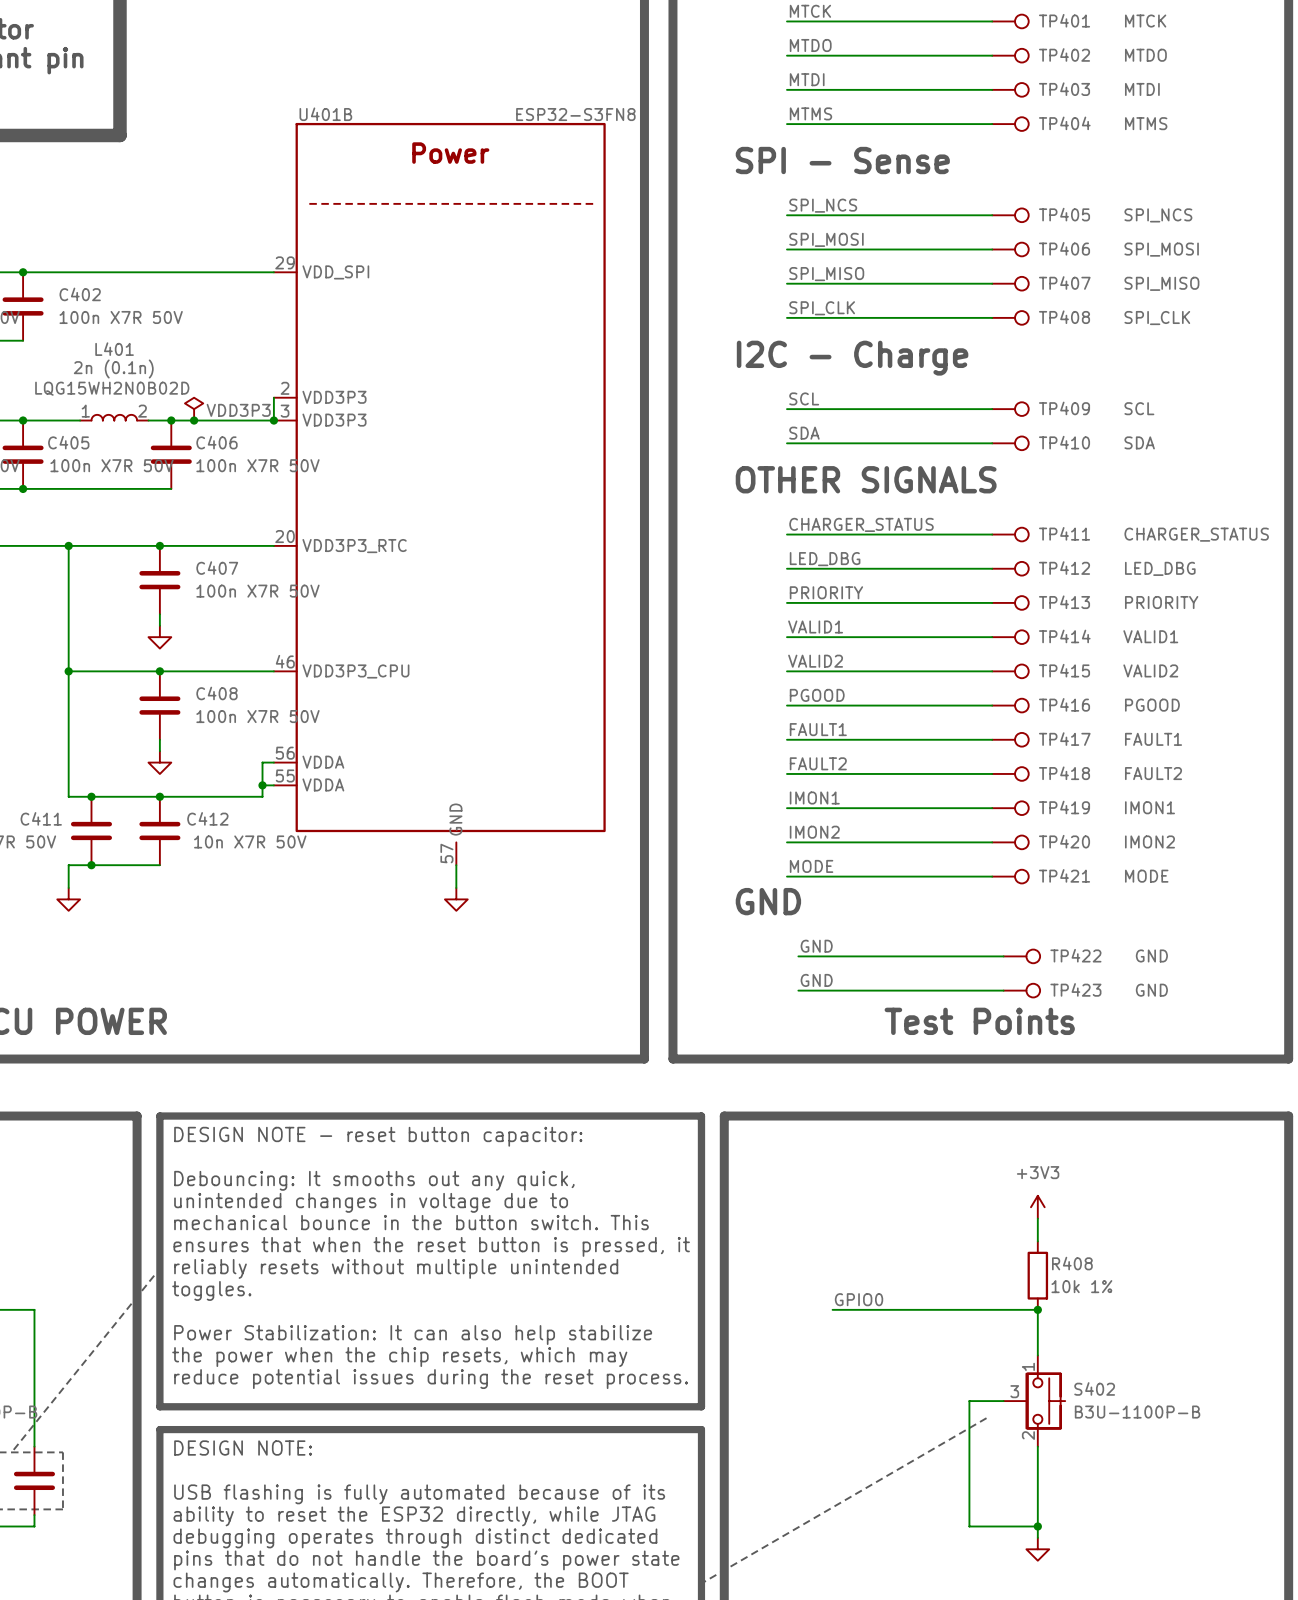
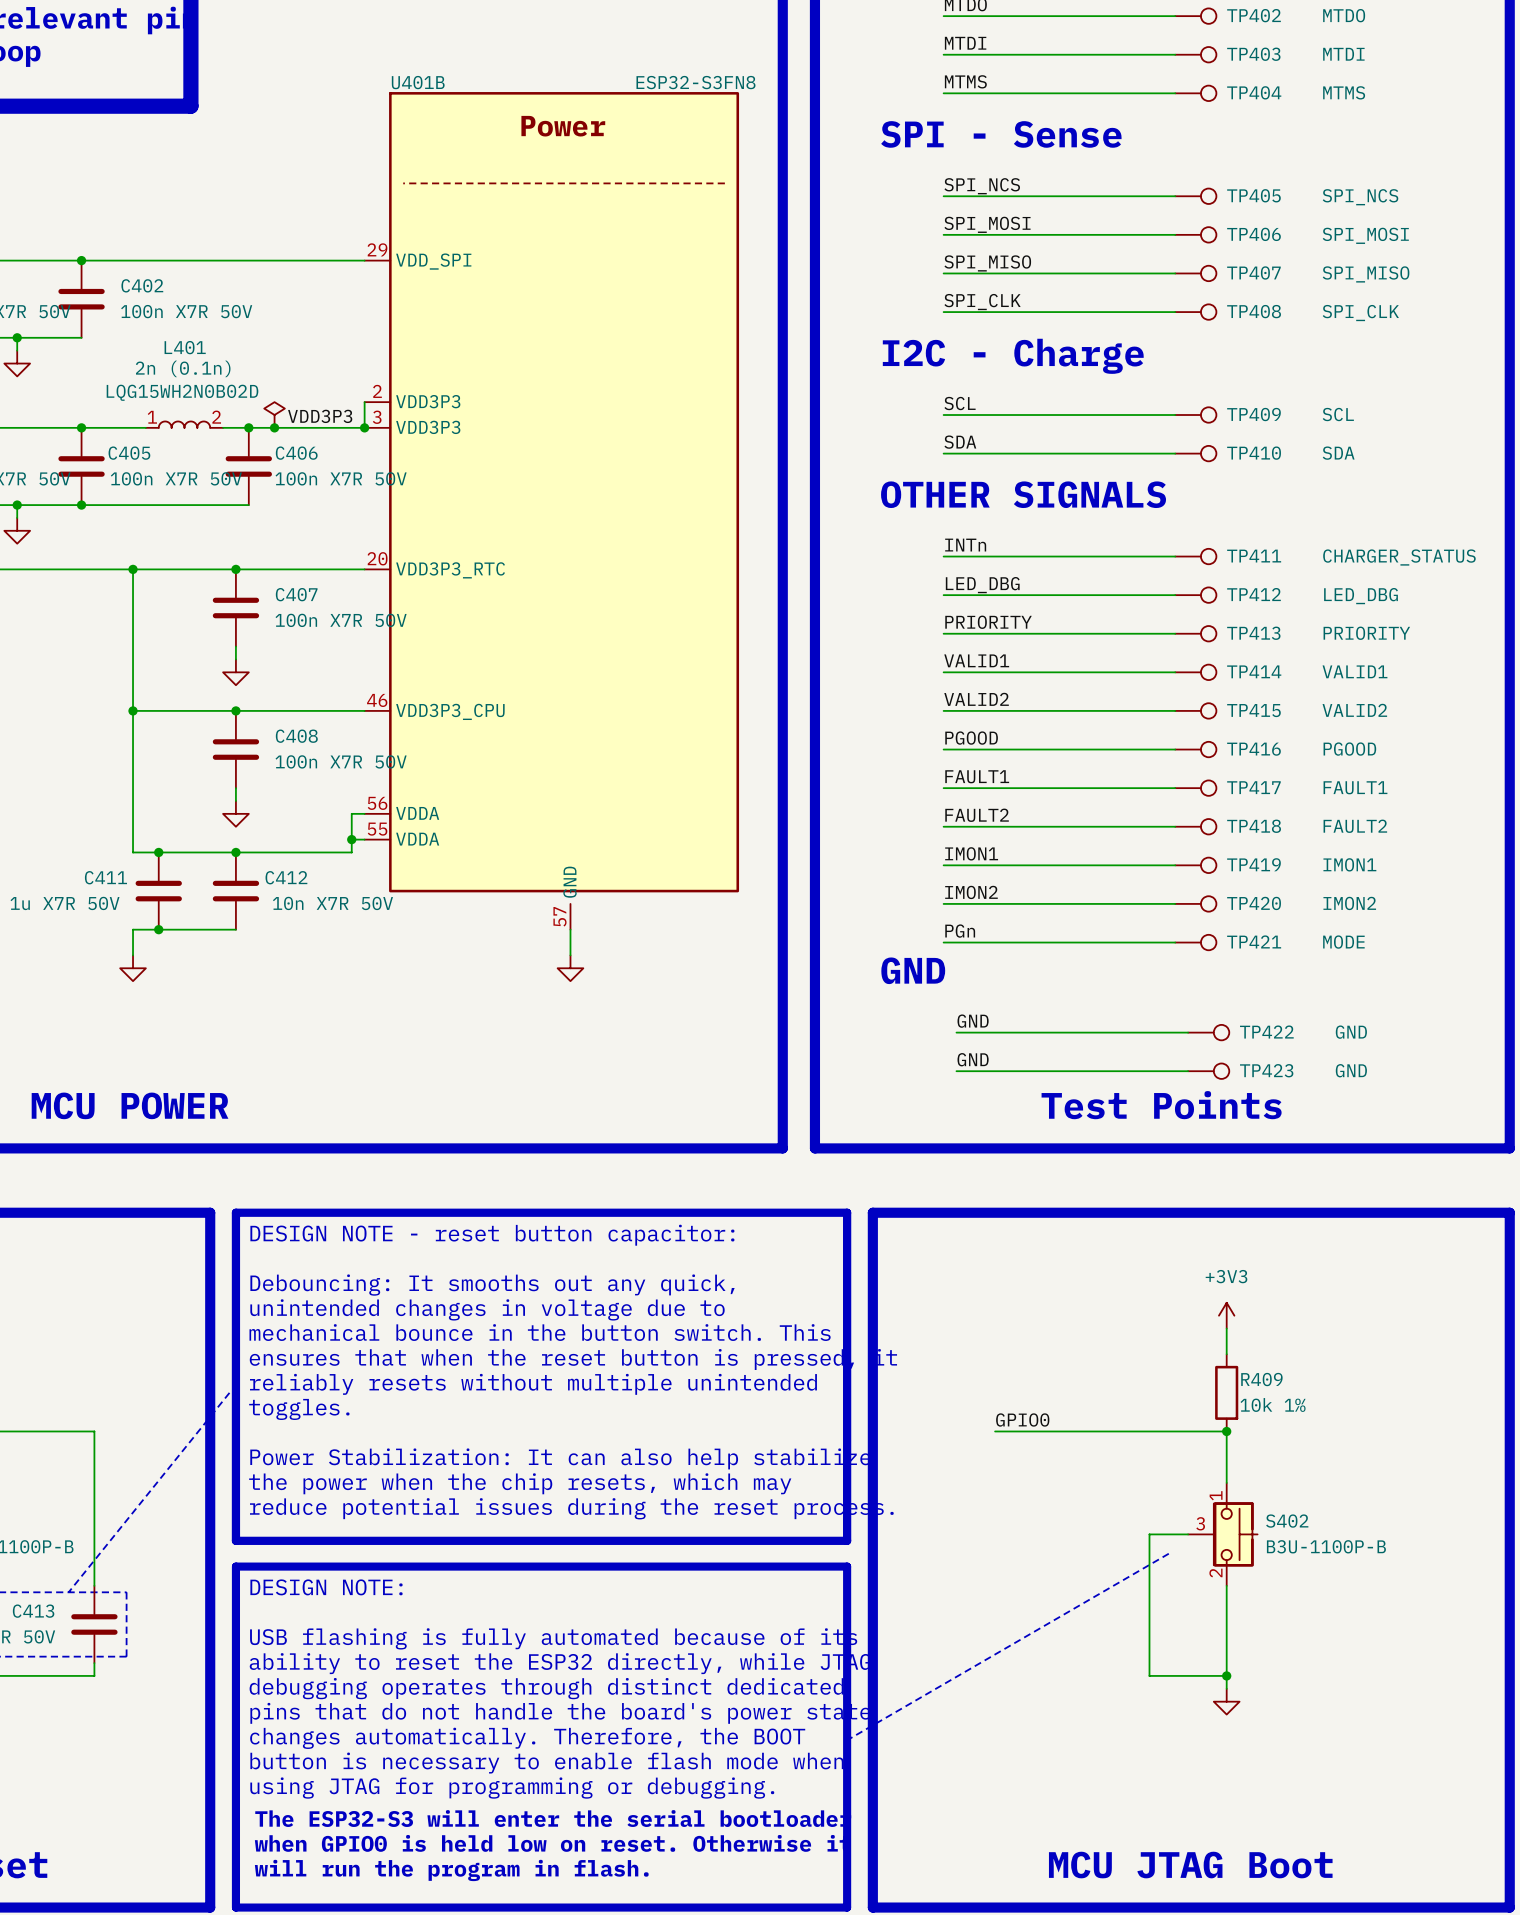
label: CHARGER_STATUS (861, 524) -> INTn (965, 545)
label: MODE (811, 866) -> PGn (960, 931)
R408 name: R408 (1072, 1263) -> R409 (1261, 1379)

